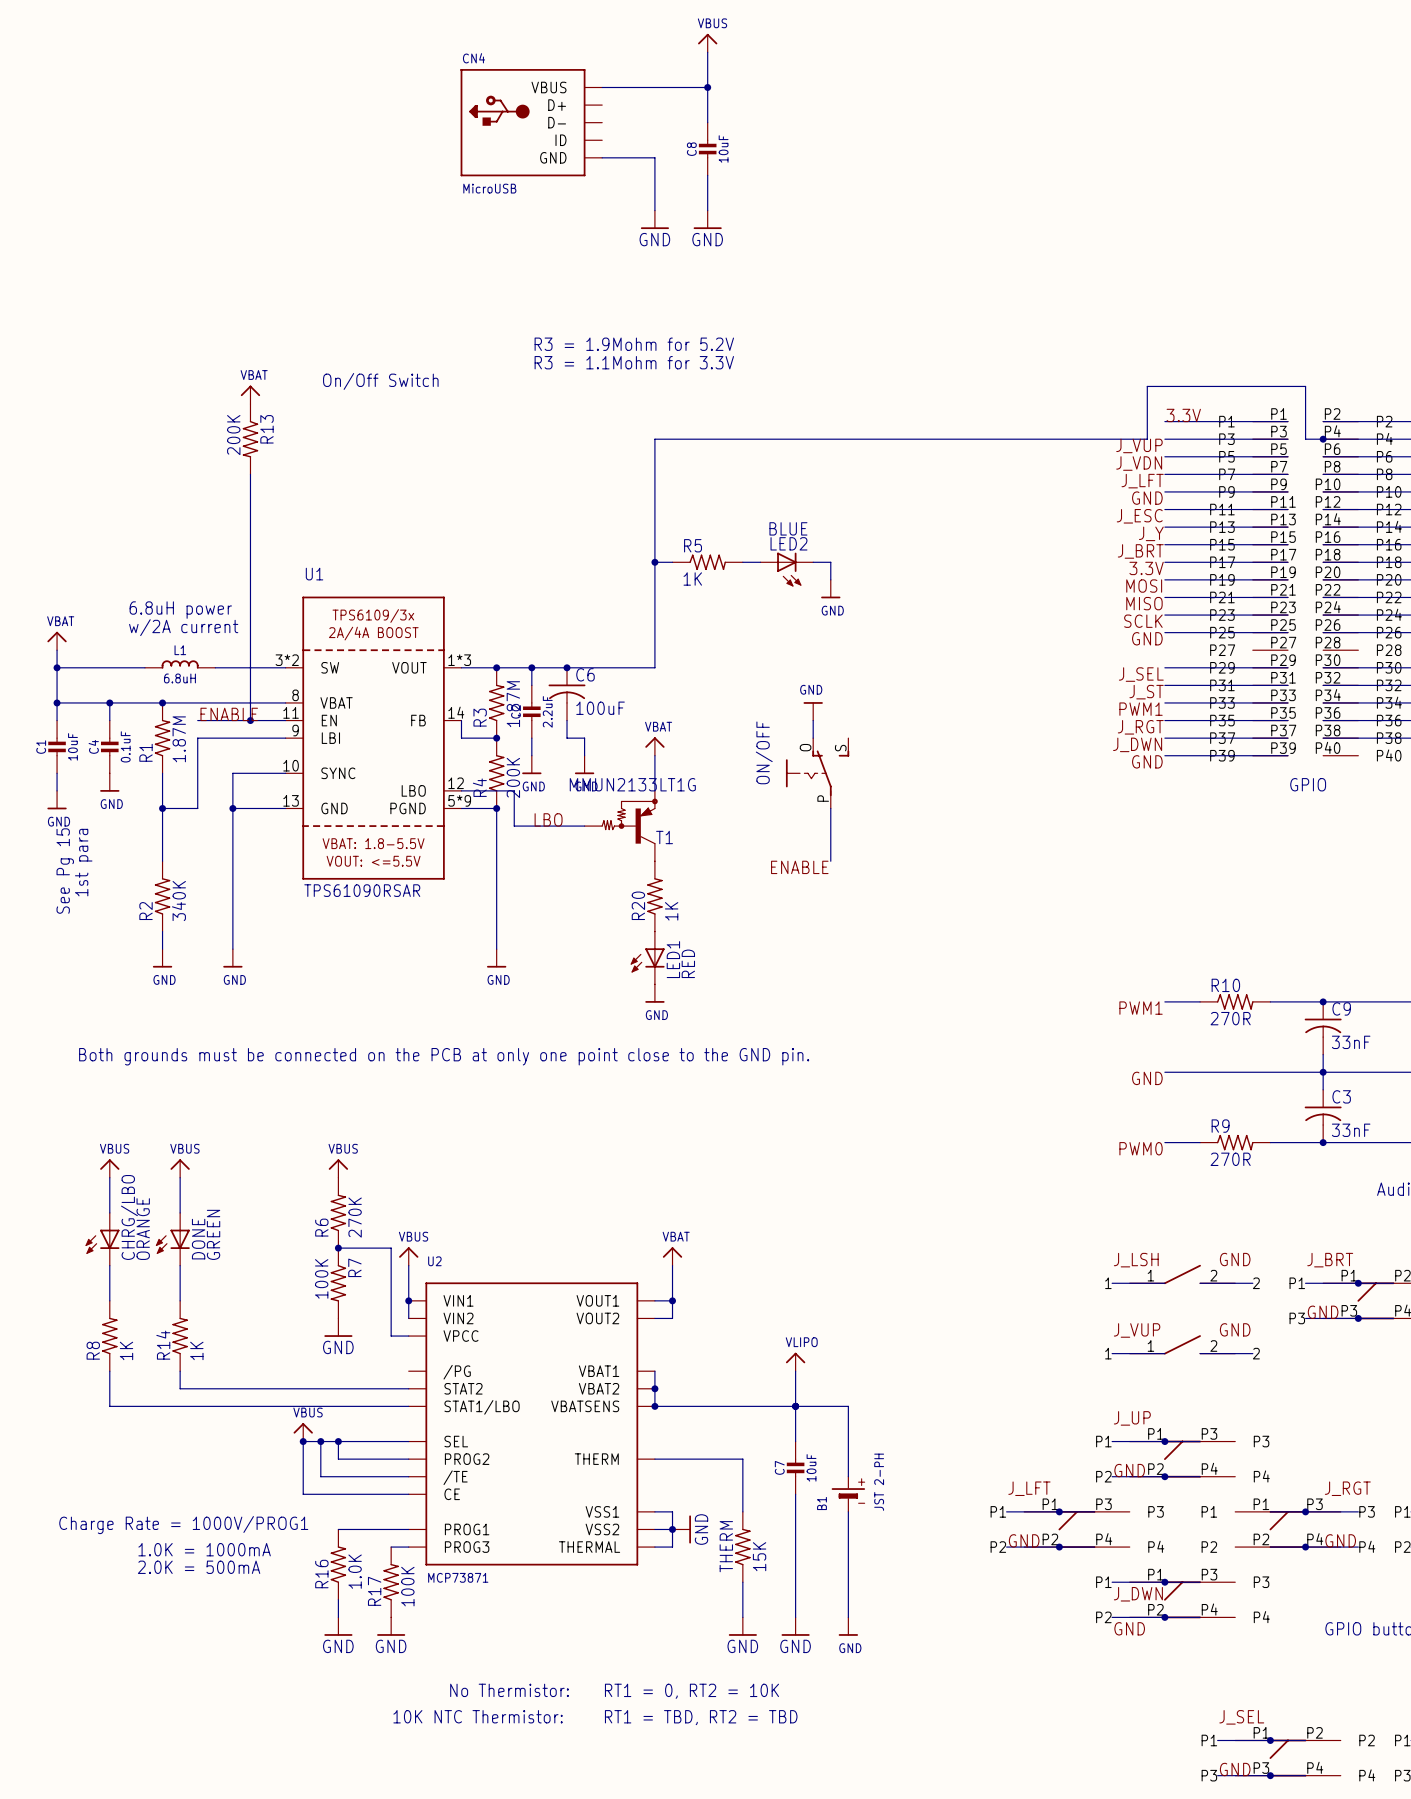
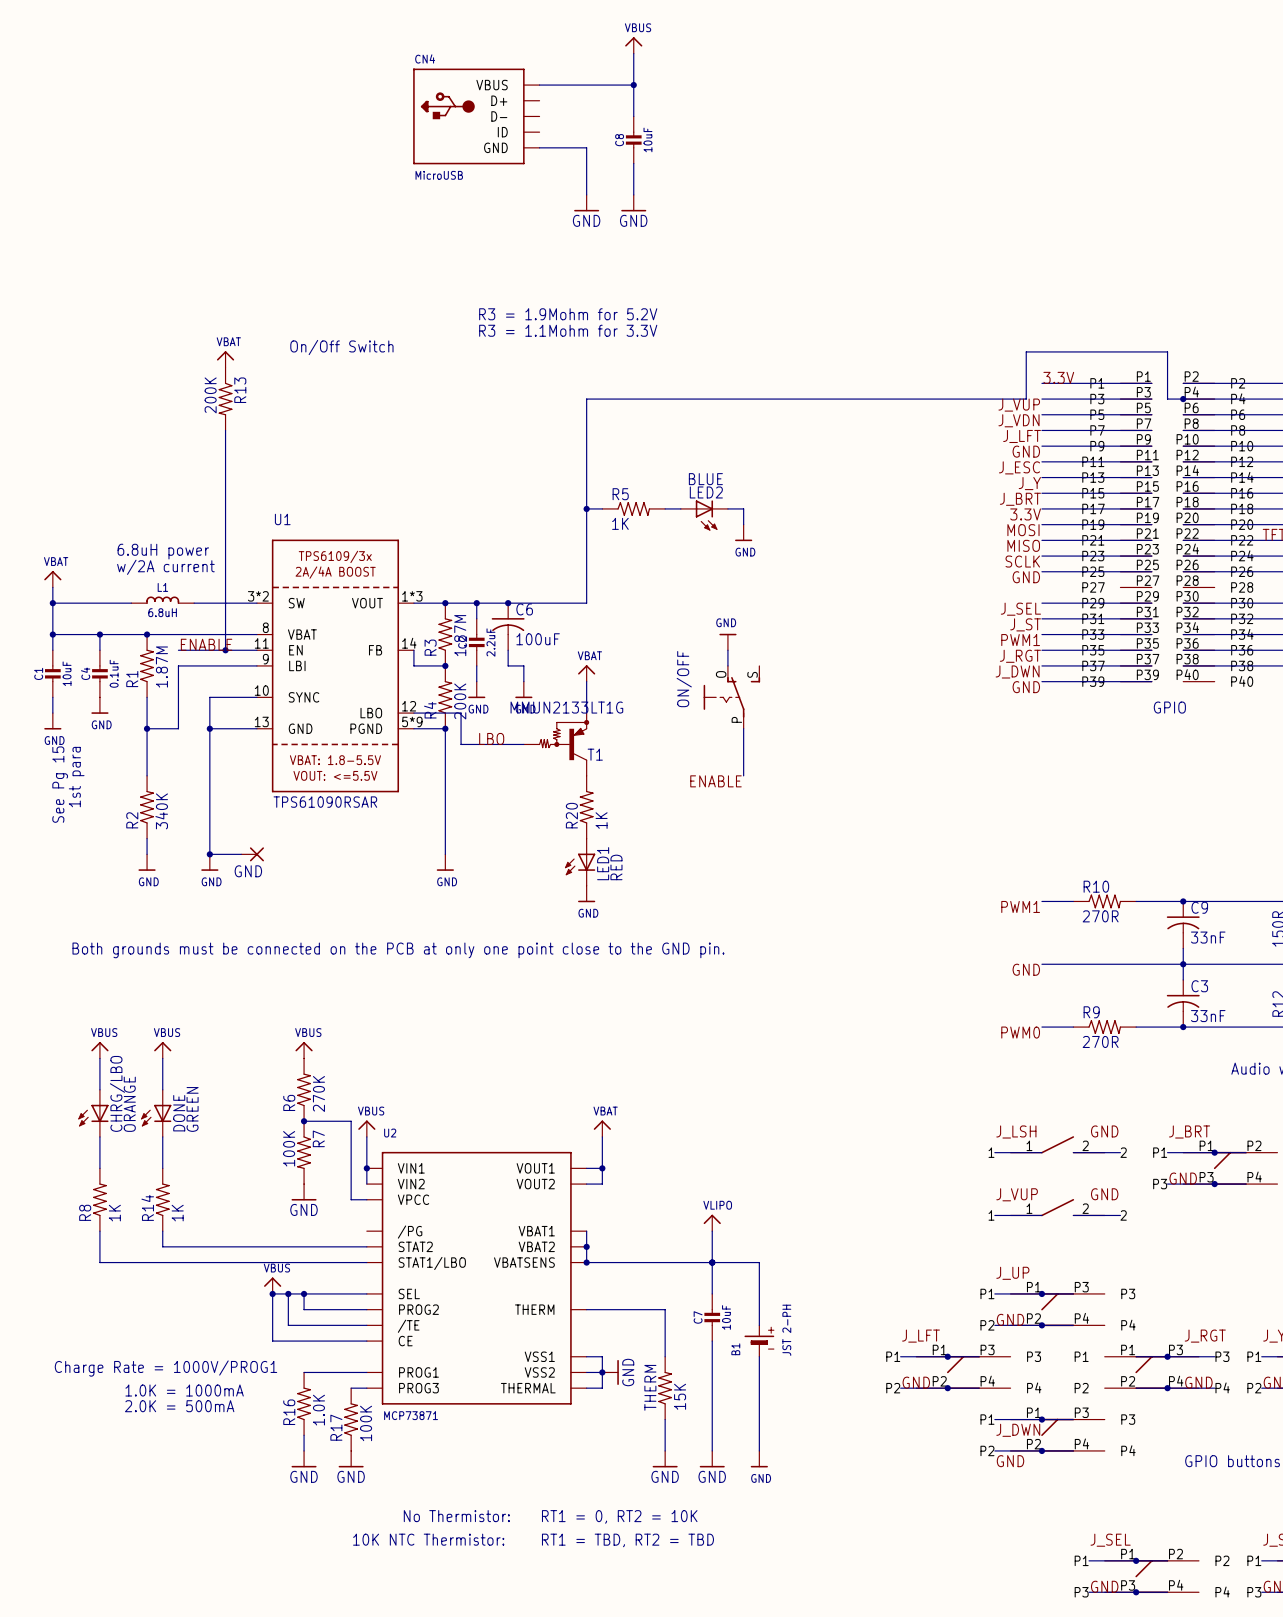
wire: none -> (209, 854) (241, 854)
junction: none -> (209, 854)
GND: none -> (252, 854)

